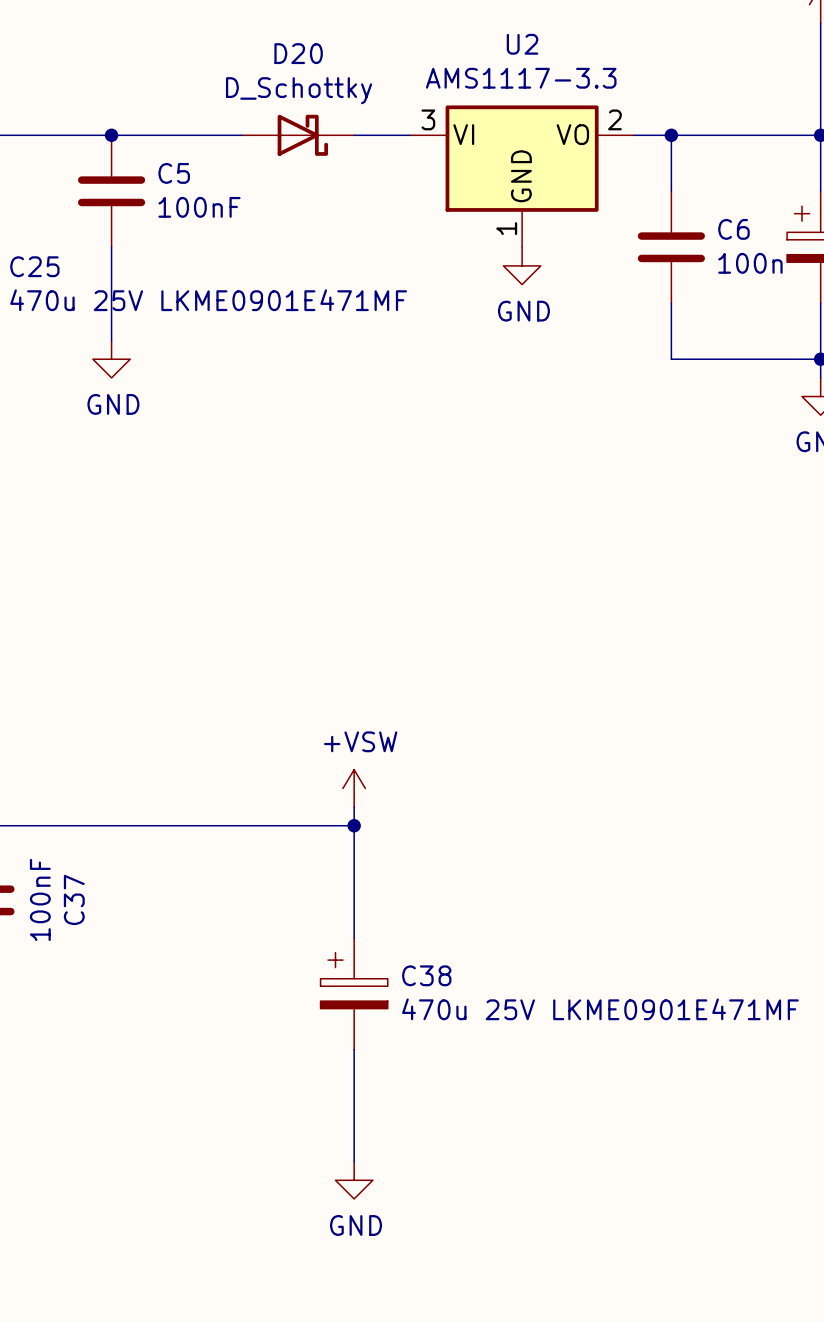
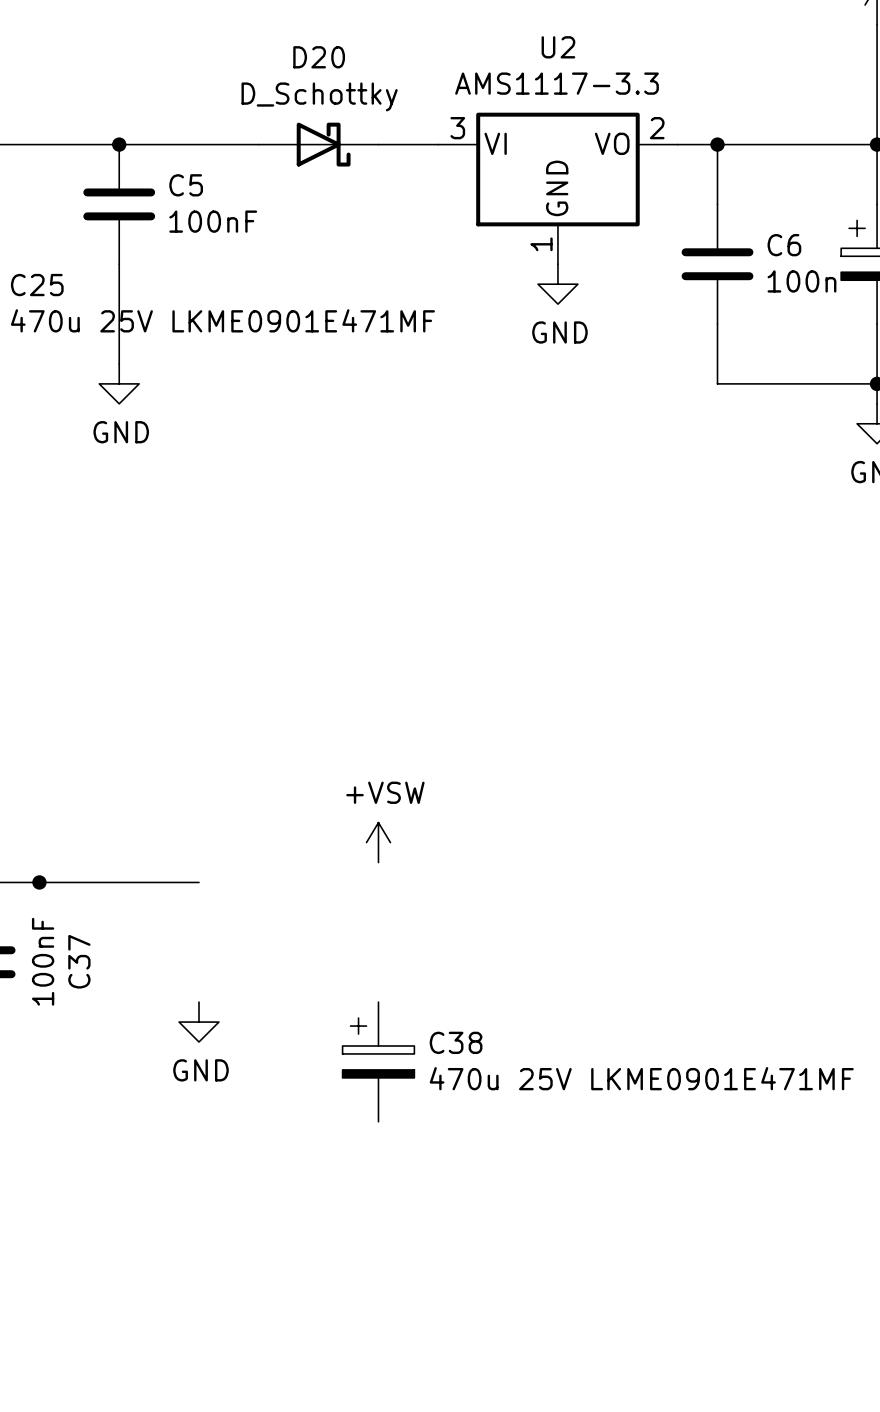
wire: (354, 807) (354, 937) -> none
junction: none -> (39, 882)
wire: (186, 825) (354, 825) -> none
junction: (354, 825) -> none
wire: (354, 1049) (354, 1161) -> none
power symbol position: GND (354, 1180) -> GND (199, 1022)

